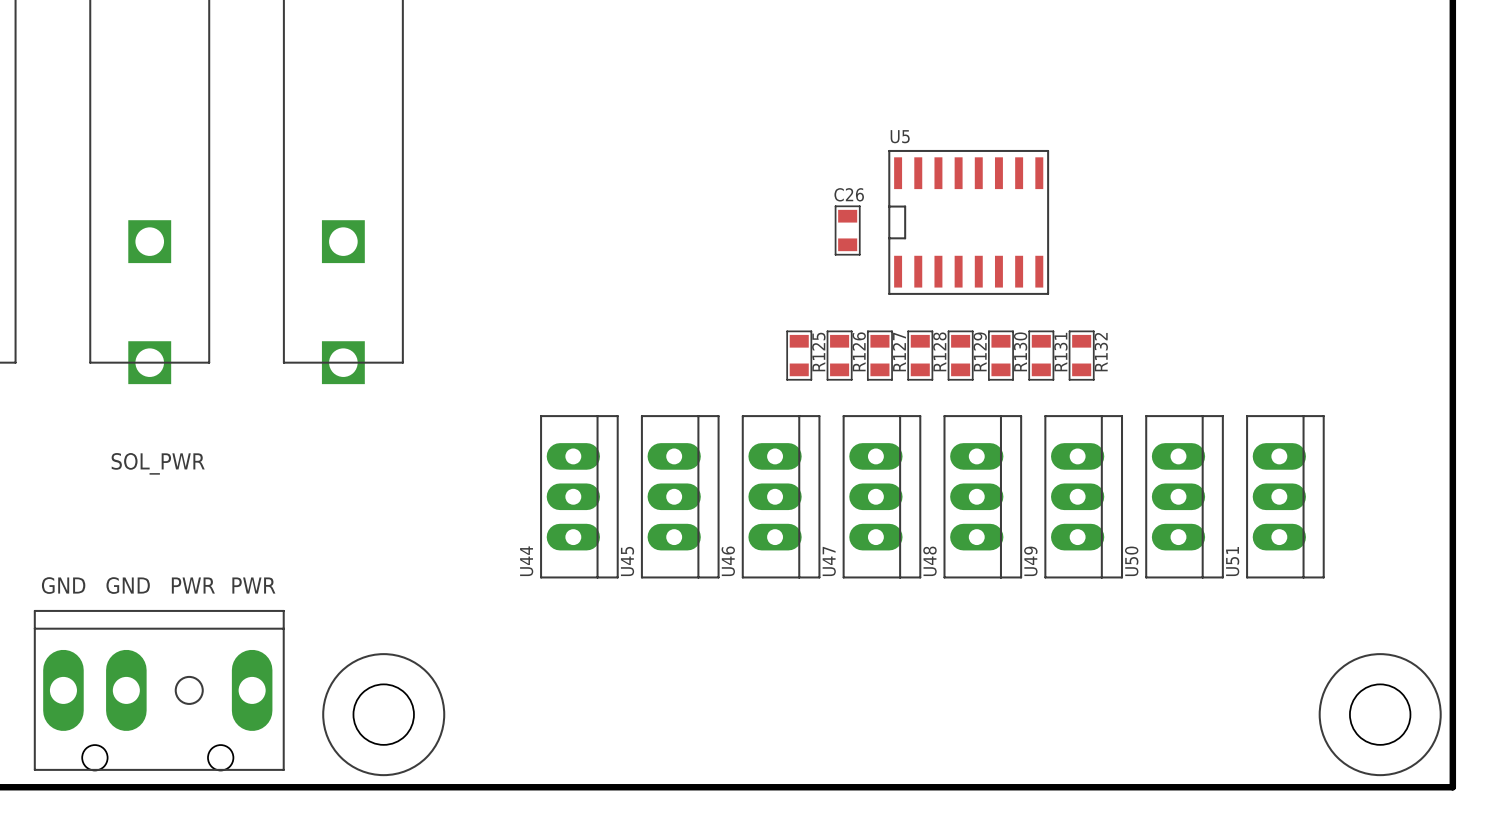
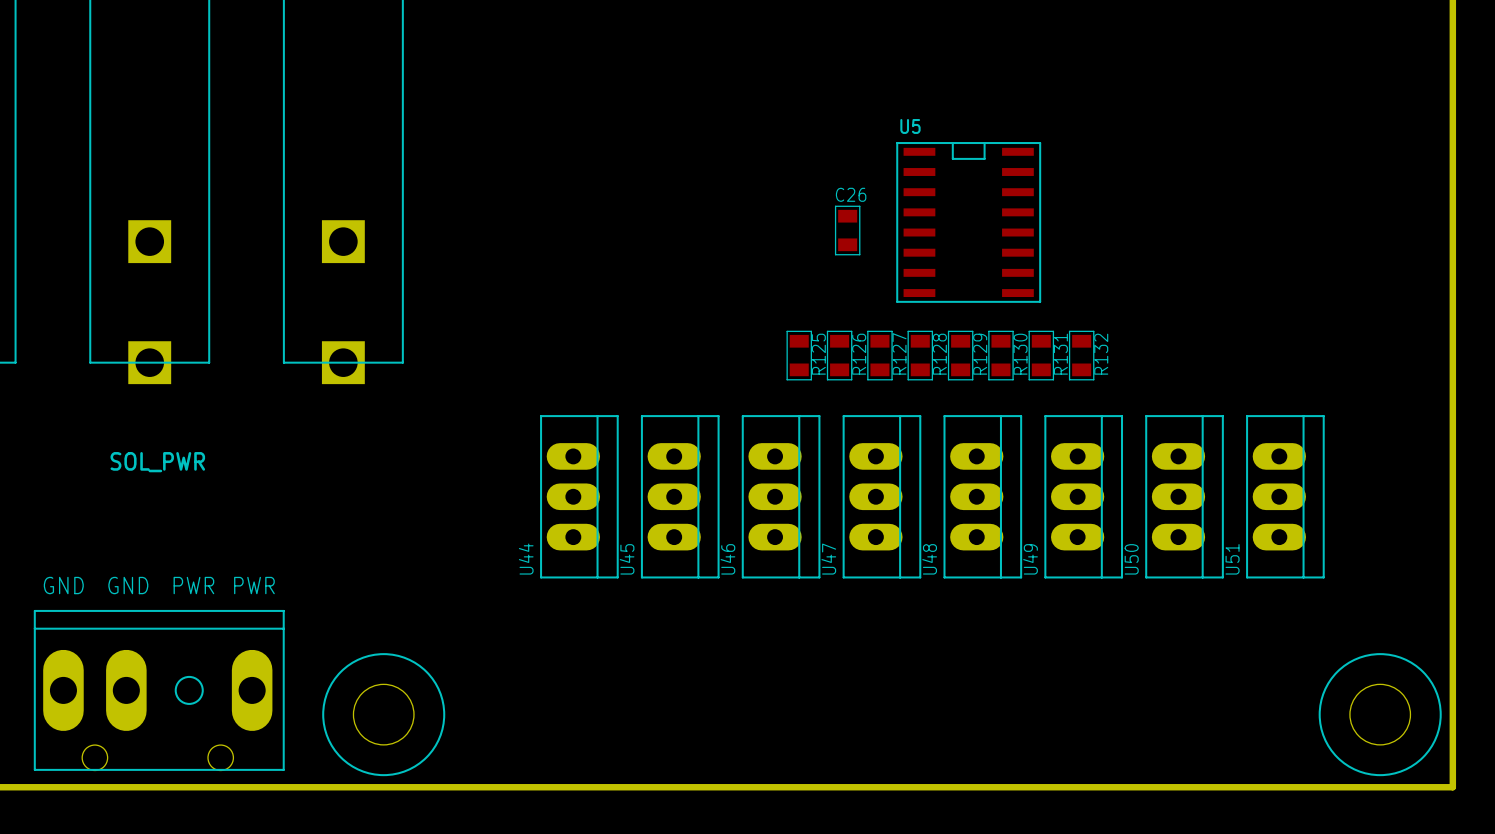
U5 rotation: 0° (968, 222) -> 90° clockwise (968, 222)

